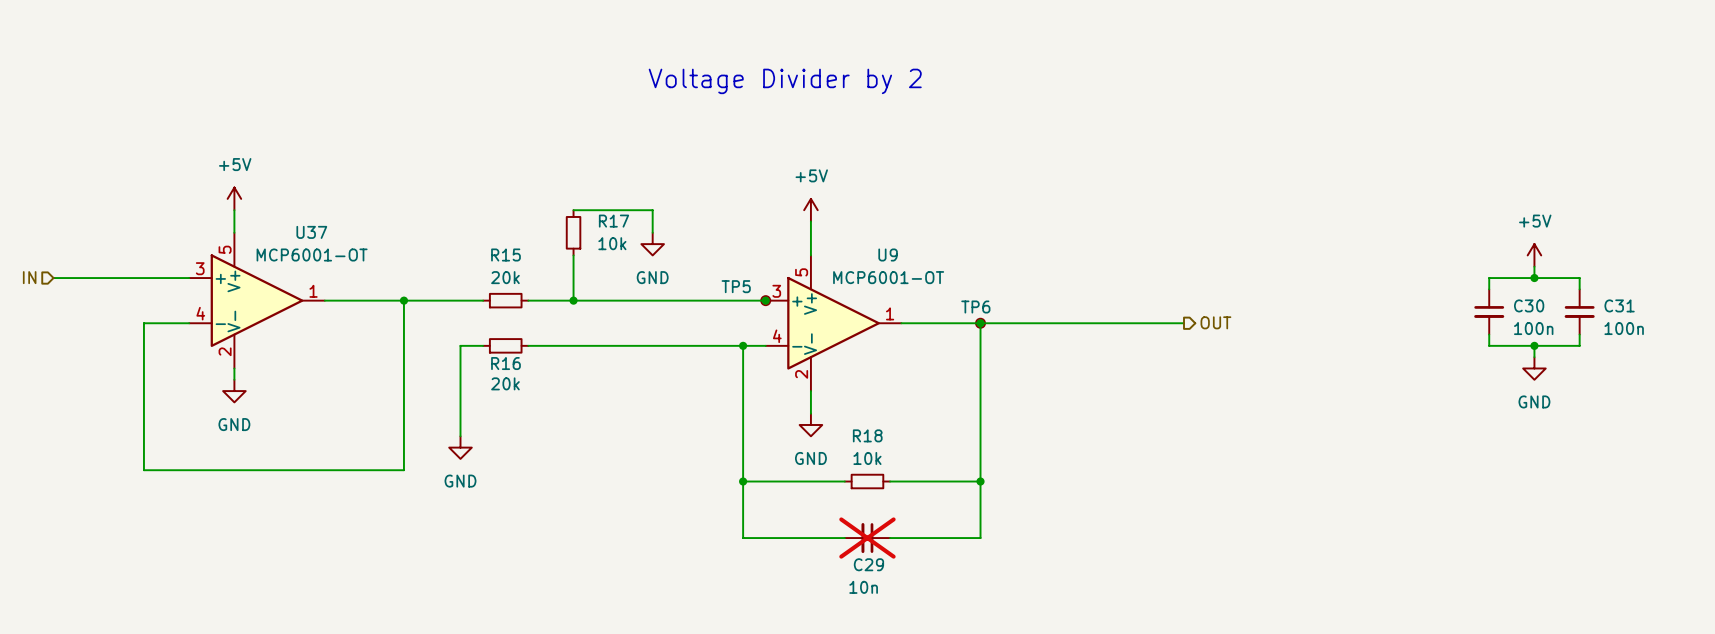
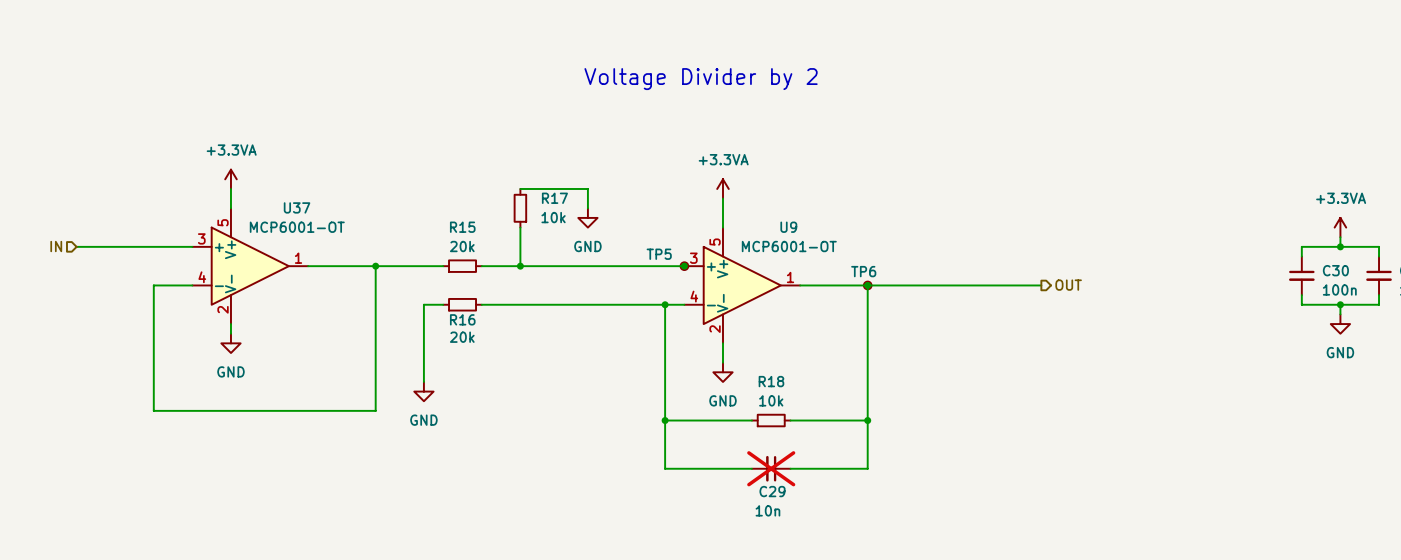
power symbol: +5V (234, 198) -> +3.3VA (230, 179)
power symbol: +5V (810, 210) -> +3.3VA (722, 188)
power symbol: +5V (1534, 255) -> +3.3VA (1340, 227)

